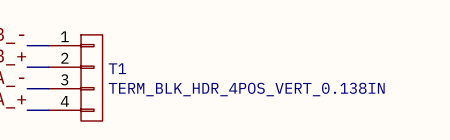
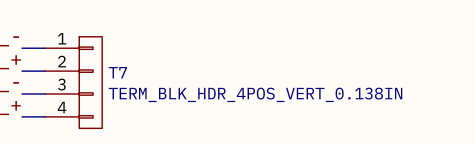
T1 name: T1 (117, 68) -> T7 (117, 72)

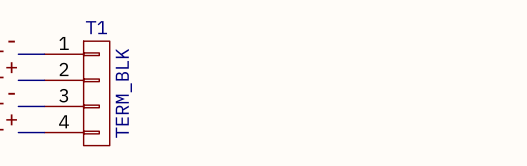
T7 name: T7 (117, 72) -> T1 (96, 27)
T7 value: TERM_BLK_HDR_4POS_VERT_0.138IN (255, 94) -> TERM_BLK (123, 93)

